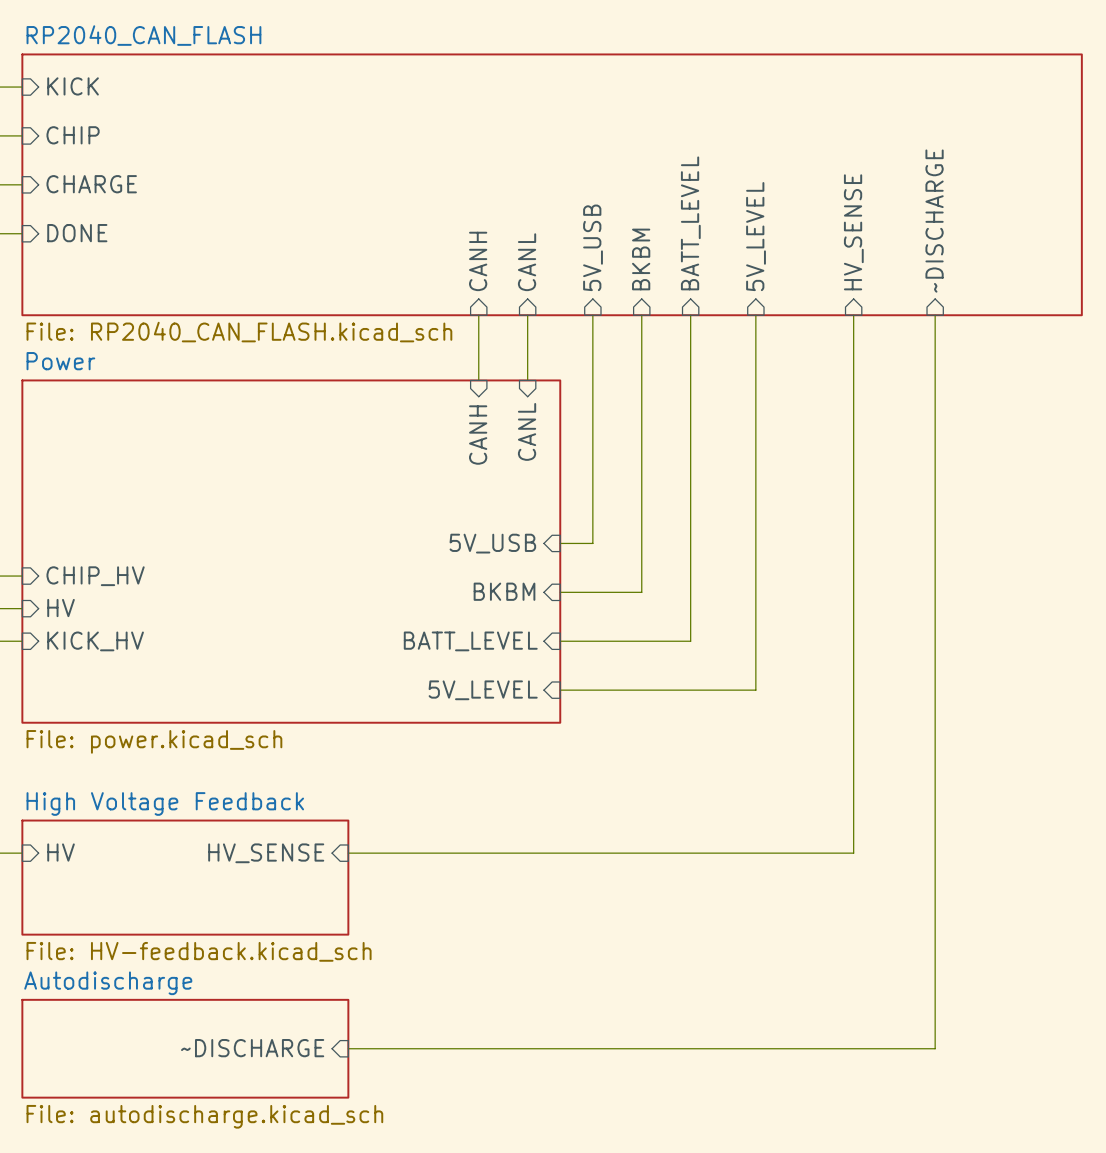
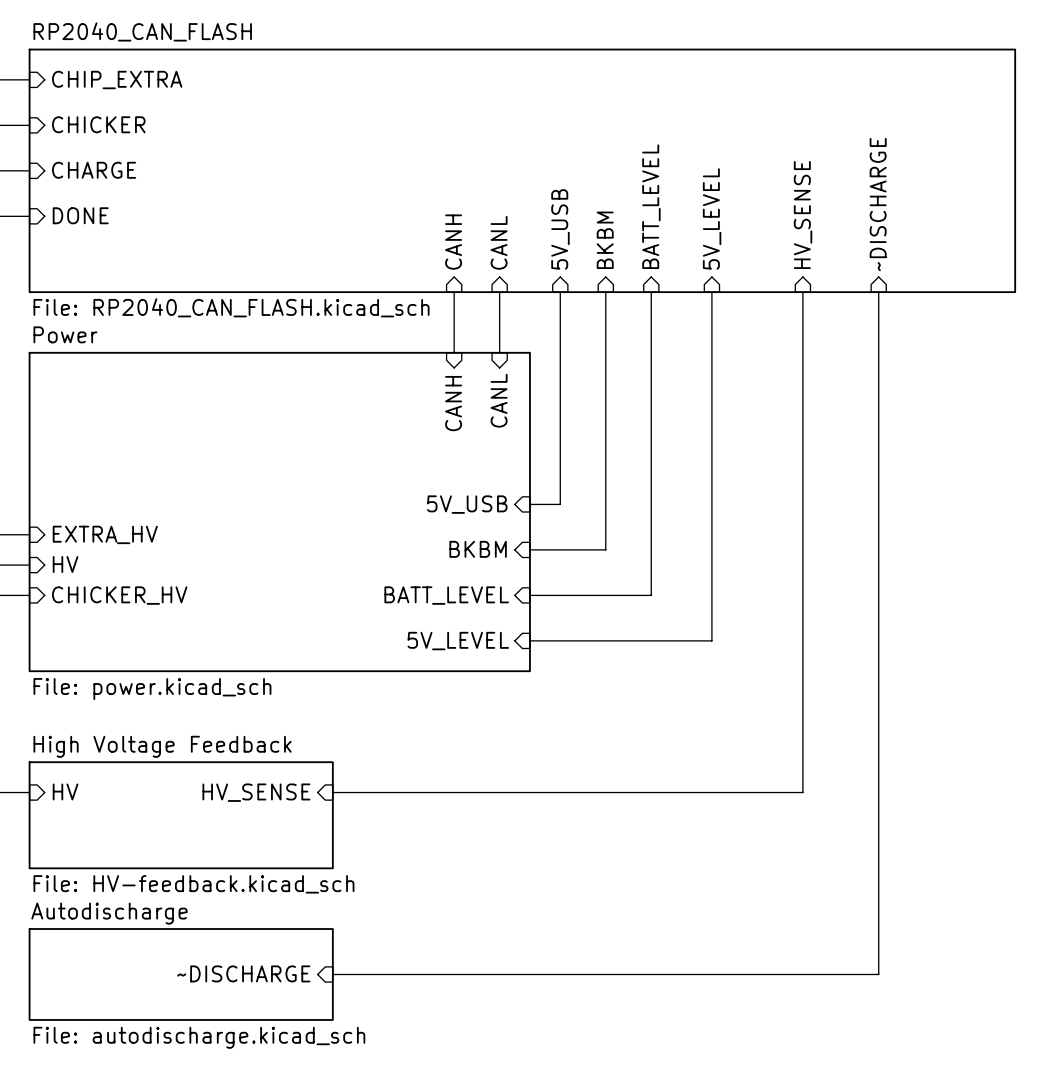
sheet pin: KICK (73, 86) -> CHIP_EXTRA (117, 80)
sheet pin: CHIP (73, 135) -> CHICKER (98, 124)
sheet pin: CHIP_HV (95, 576) -> EXTRA_HV (105, 534)
sheet pin: KICK_HV (95, 641) -> CHICKER_HV (119, 595)

